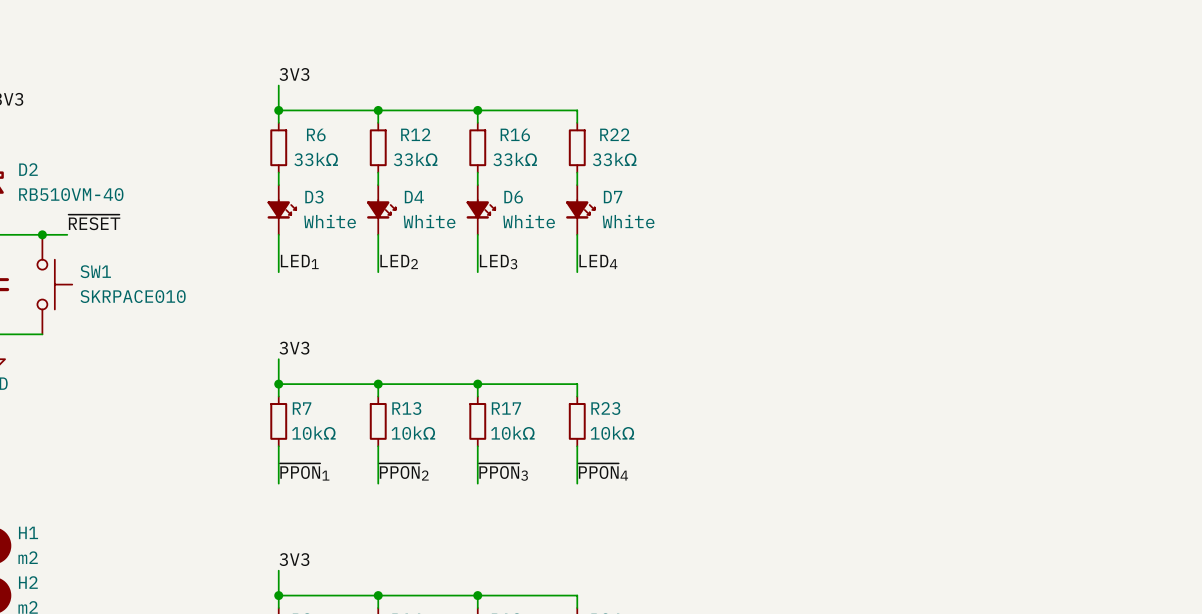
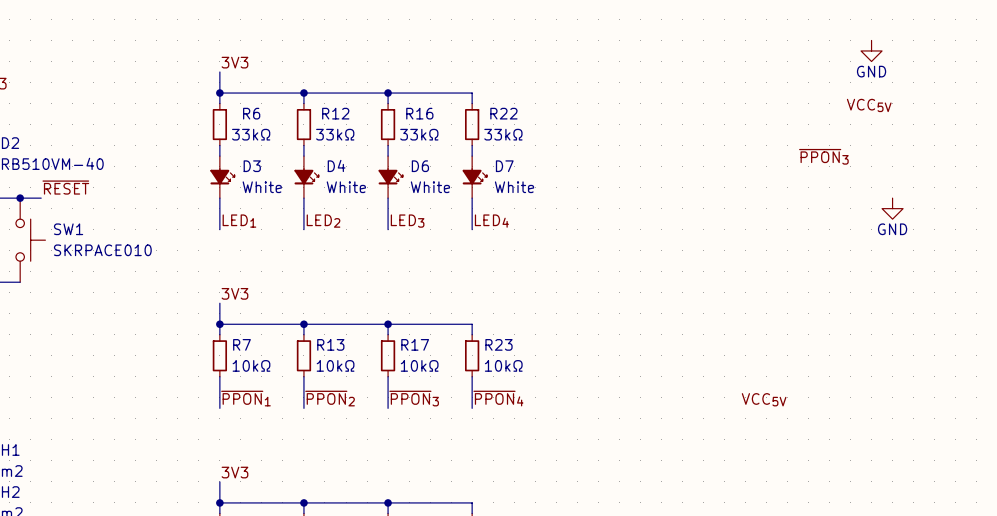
power symbol: none -> GND (871, 50)
label: none -> VCC5V (869, 105)
label: none -> ~{PPON}3 (823, 156)
power symbol: none -> GND (892, 208)
label: none -> VCC5V (764, 399)

